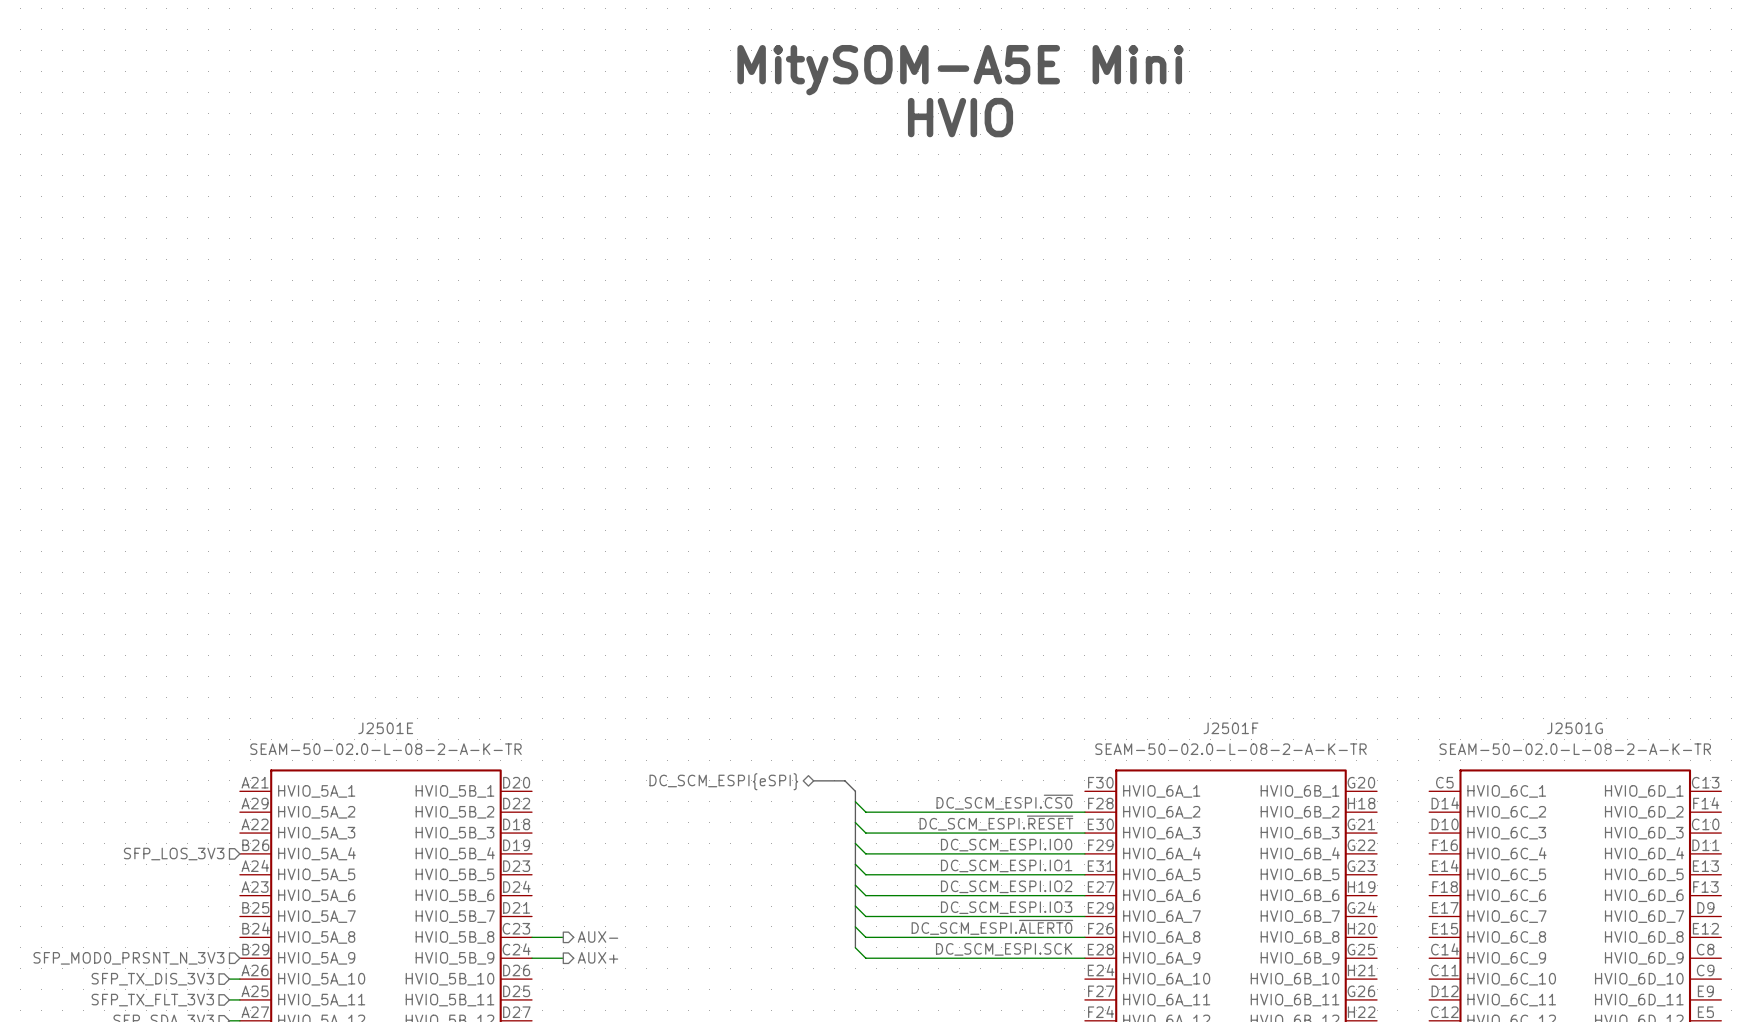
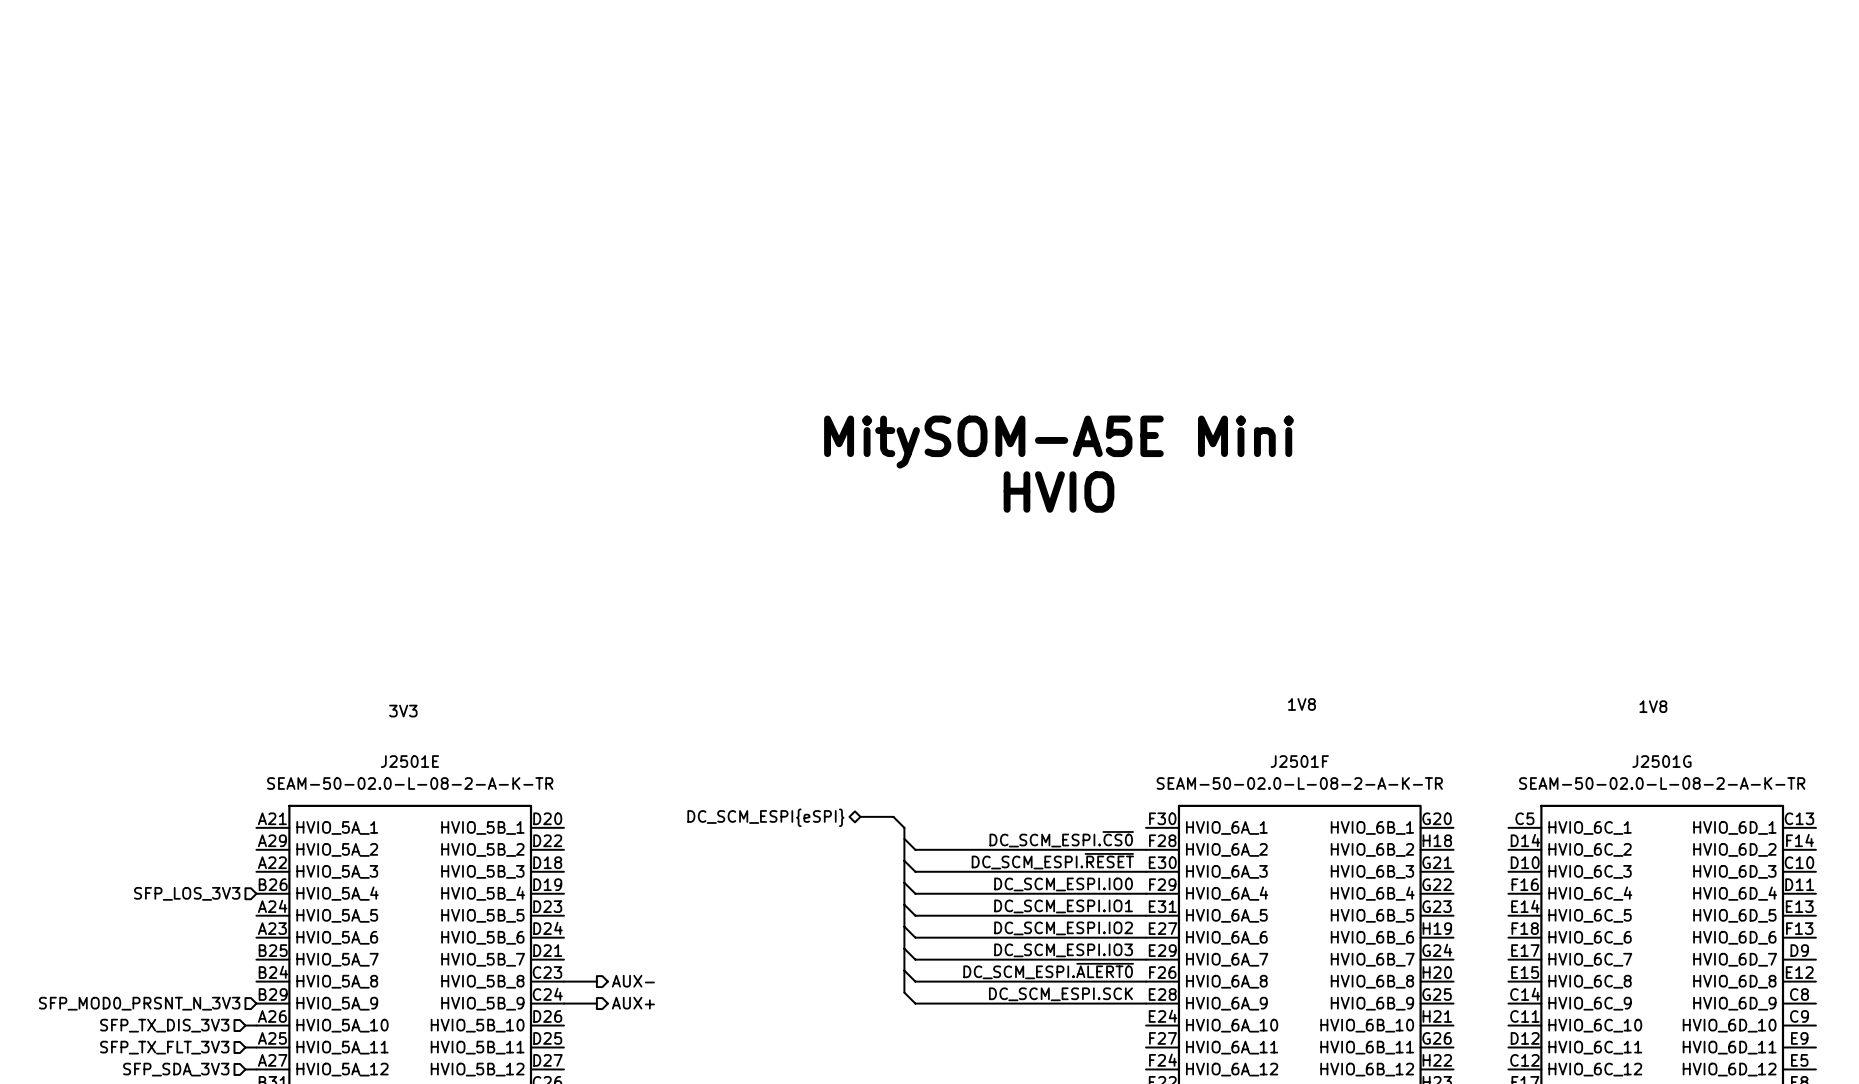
text: MitySOM-A5E Mini (960, 70) -> none
text: HVIO (960, 117) -> none
text: none -> MitySOM-A5E Mini (1058, 442)
text: none -> HVIO (1058, 492)
text: none -> 1V8 (1301, 704)
text: none -> 1V8 (1653, 706)
text: none -> 3V3 (403, 711)

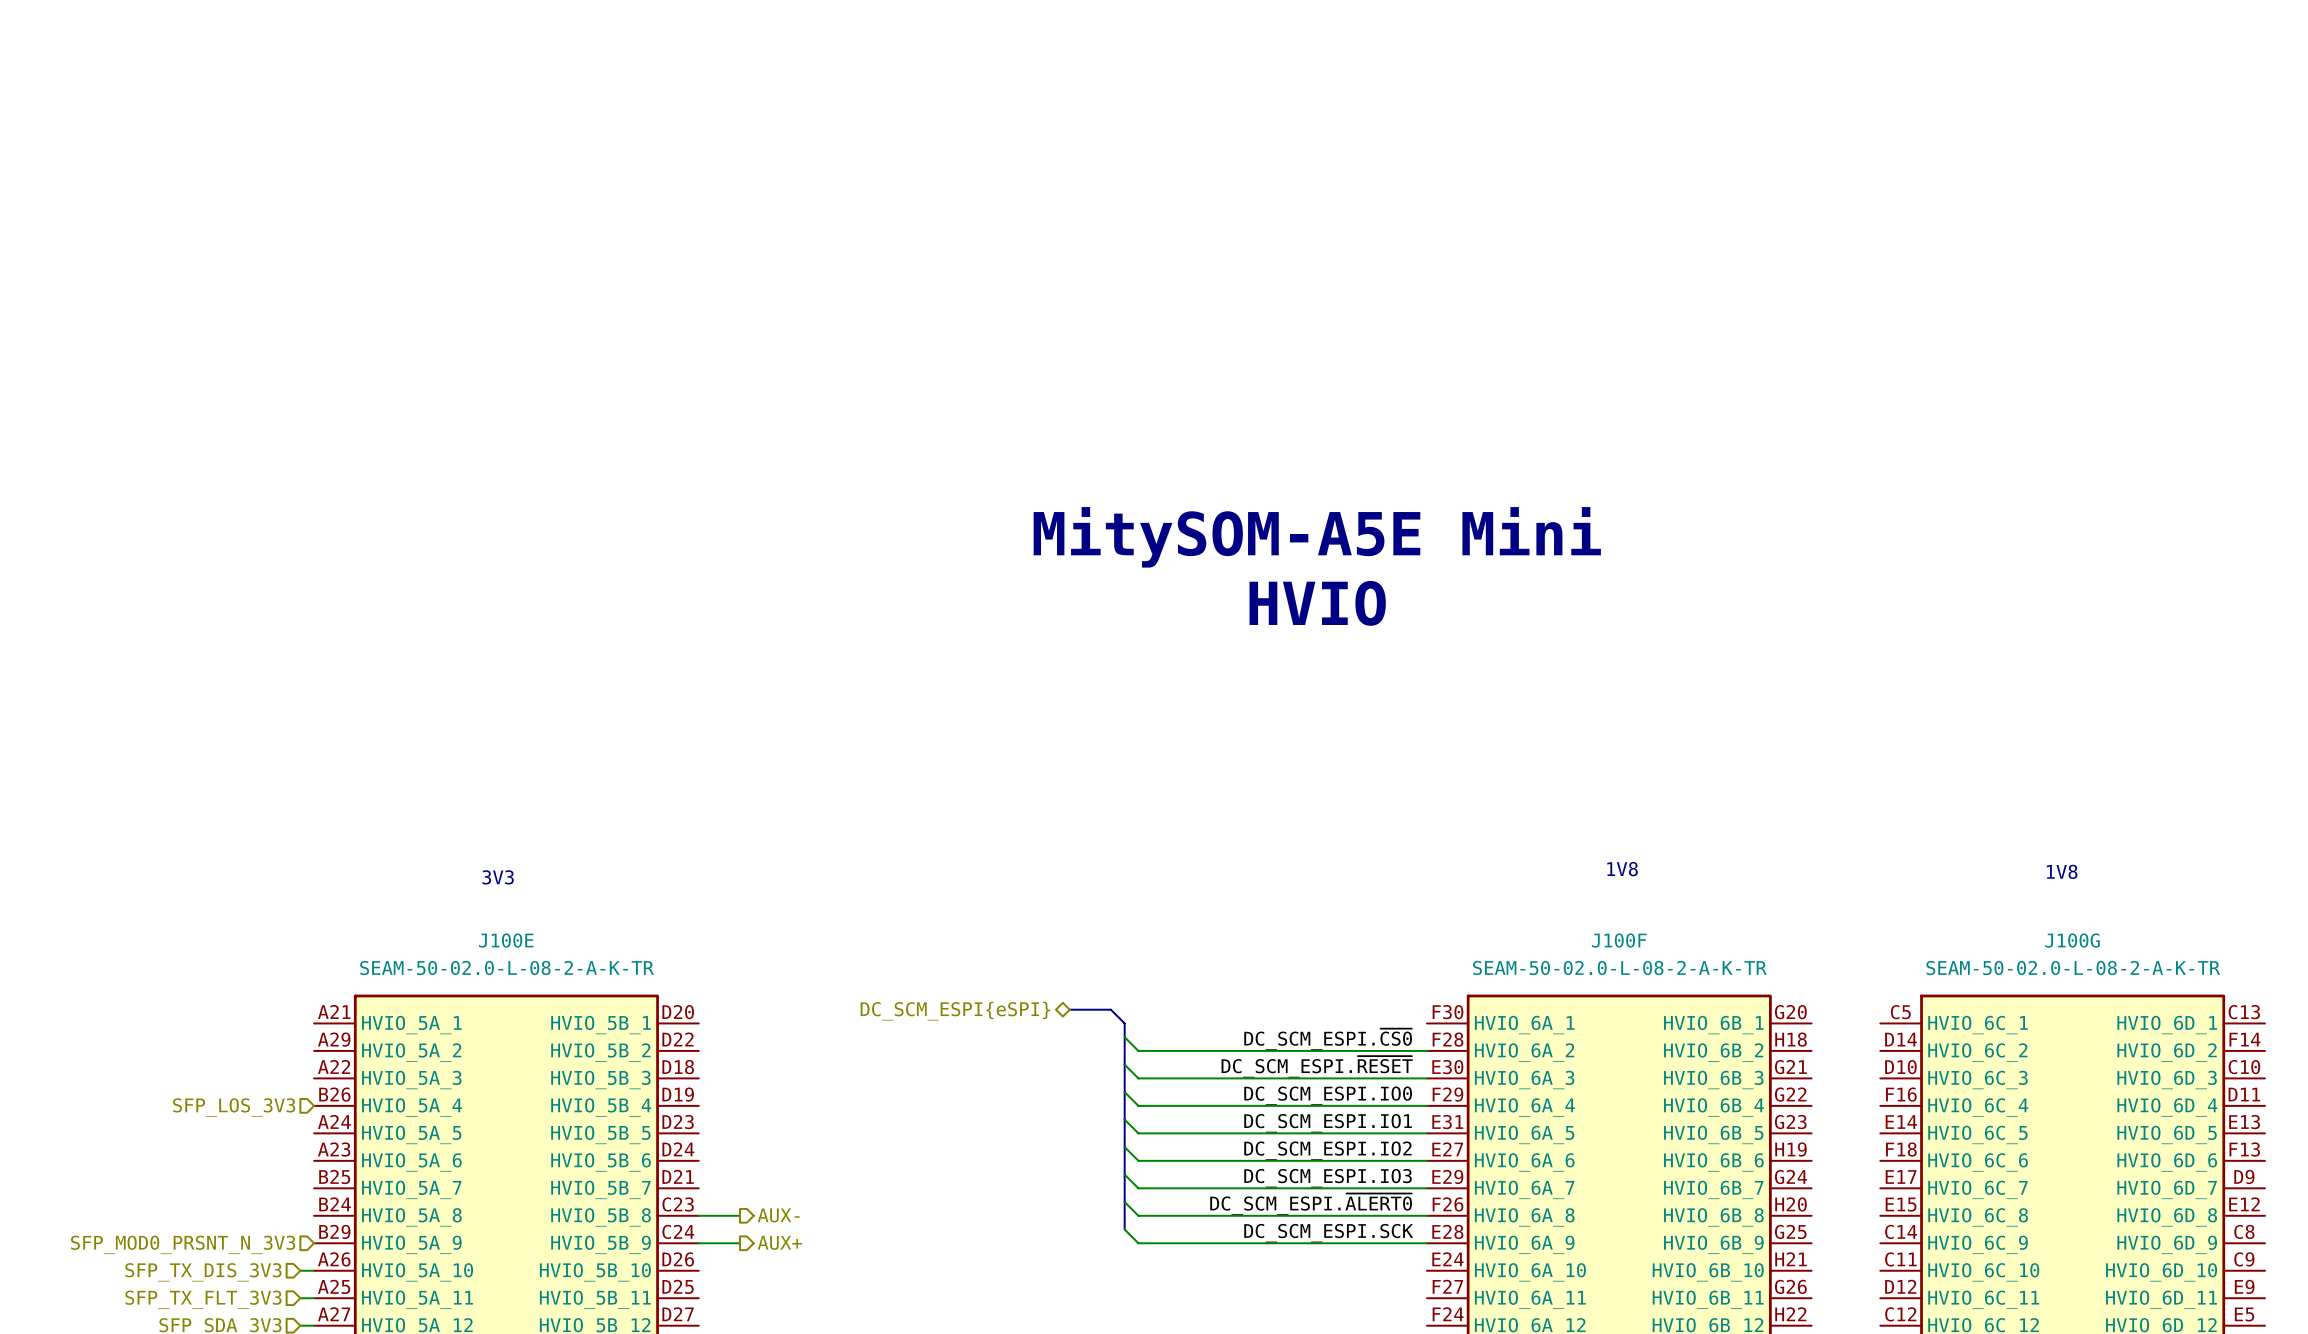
J2501E name: J2501E (409, 761) -> J100E (506, 940)
J2501F name: J2501F (1299, 761) -> J100F (1619, 940)
J2501G name: J2501G (1661, 761) -> J100G (2072, 940)

